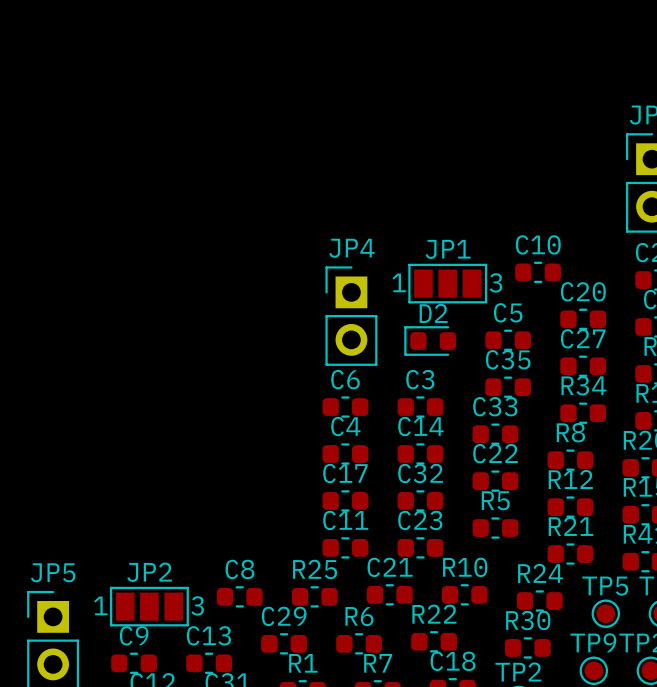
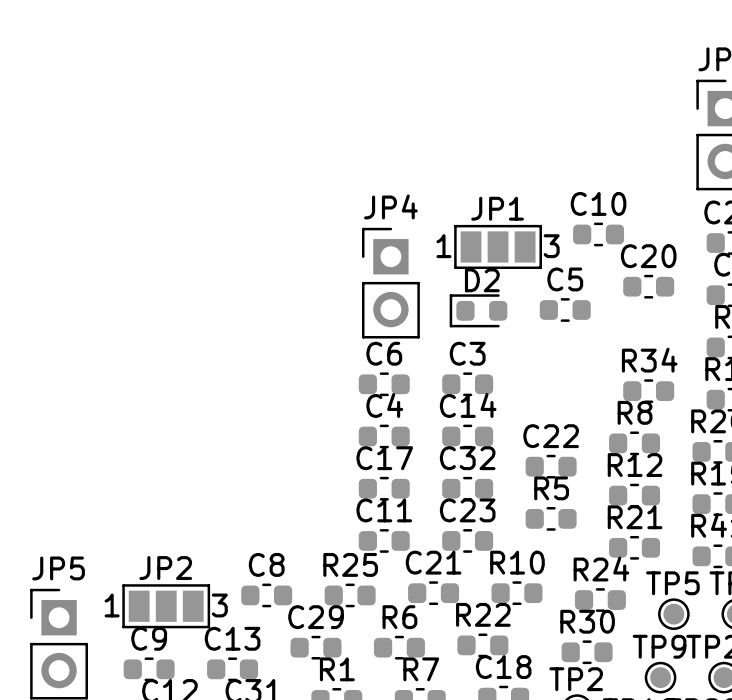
C27: (583, 366) -> none
C35: (508, 387) -> none
C33: (495, 434) -> none

